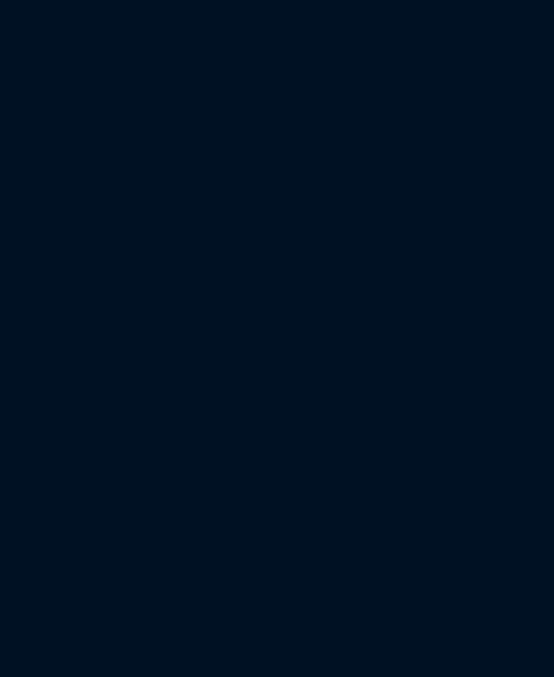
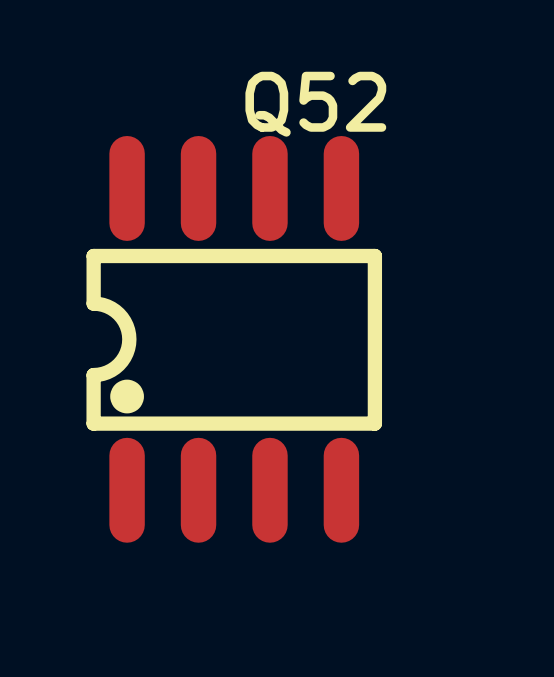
Q52: none -> (234, 339)

